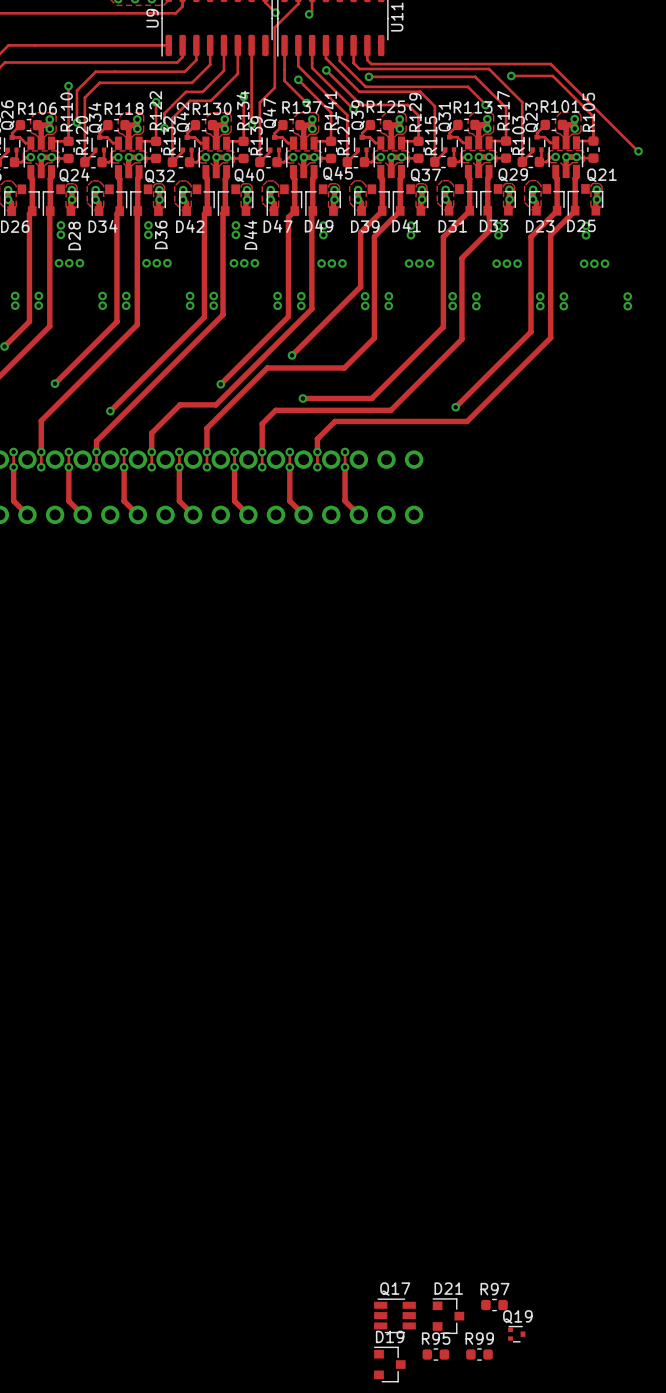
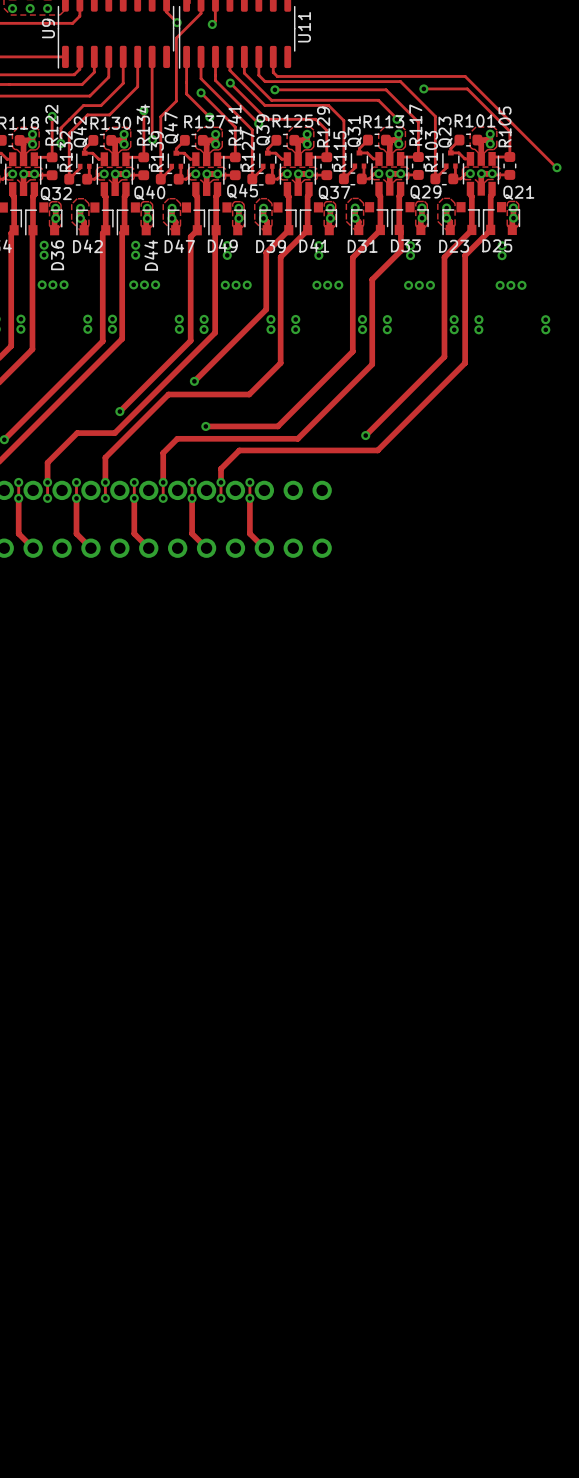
R97: (494, 1305) -> none
Q17: (394, 1315) -> none
D21: (448, 1316) -> none
Q19: (516, 1334) -> none
R95: (435, 1354) -> none
R99: (479, 1354) -> none
D19: (389, 1364) -> none

